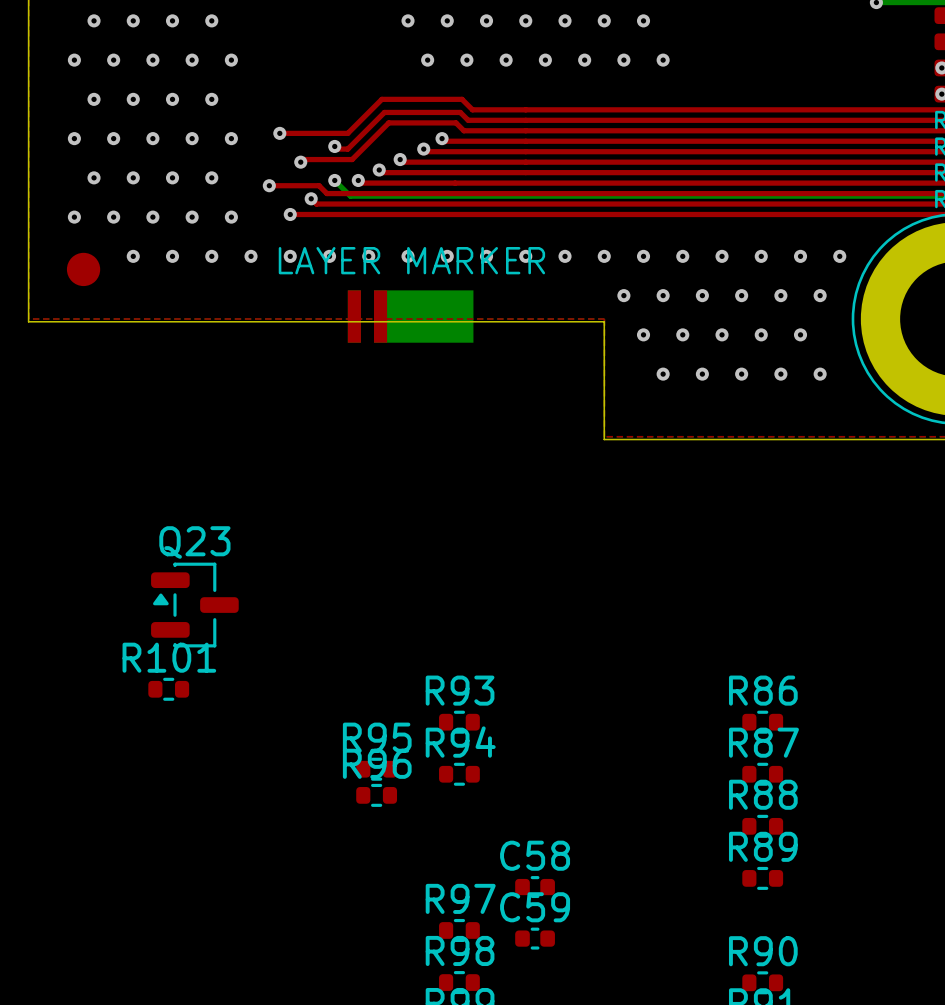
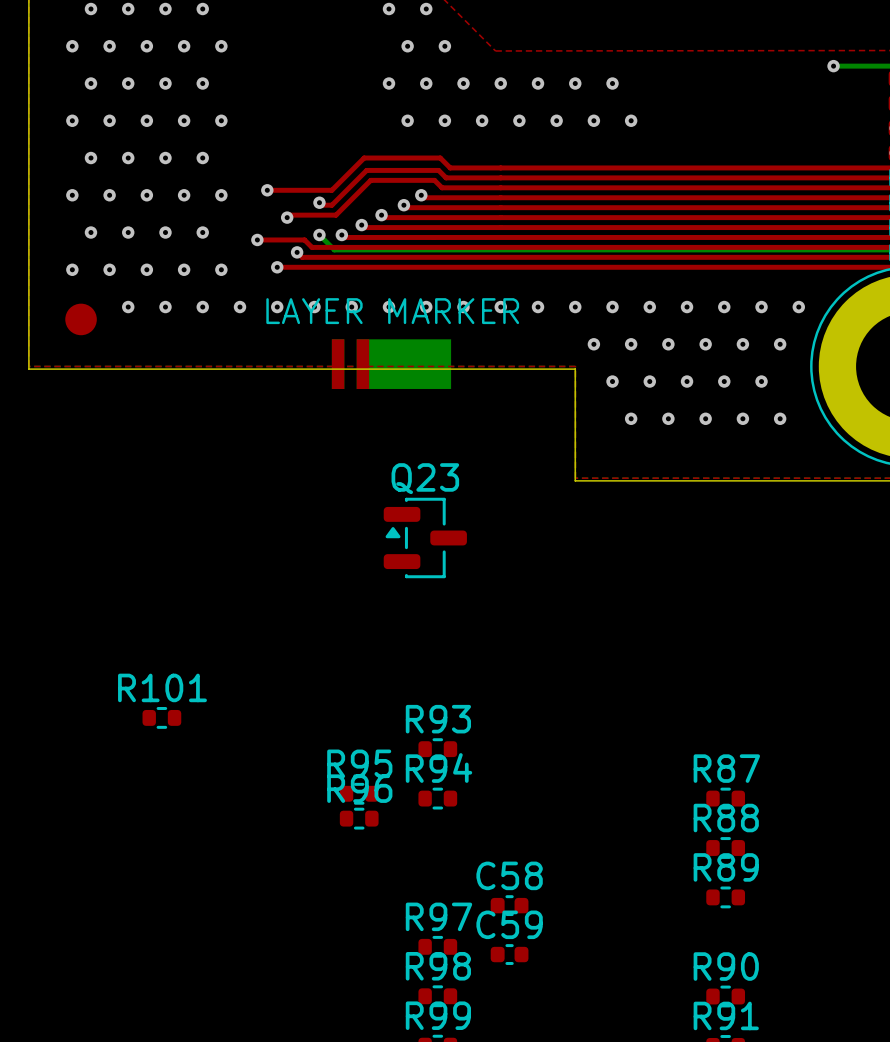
Q23 position: (194, 605) -> (425, 537)
R86: (762, 722) -> none

